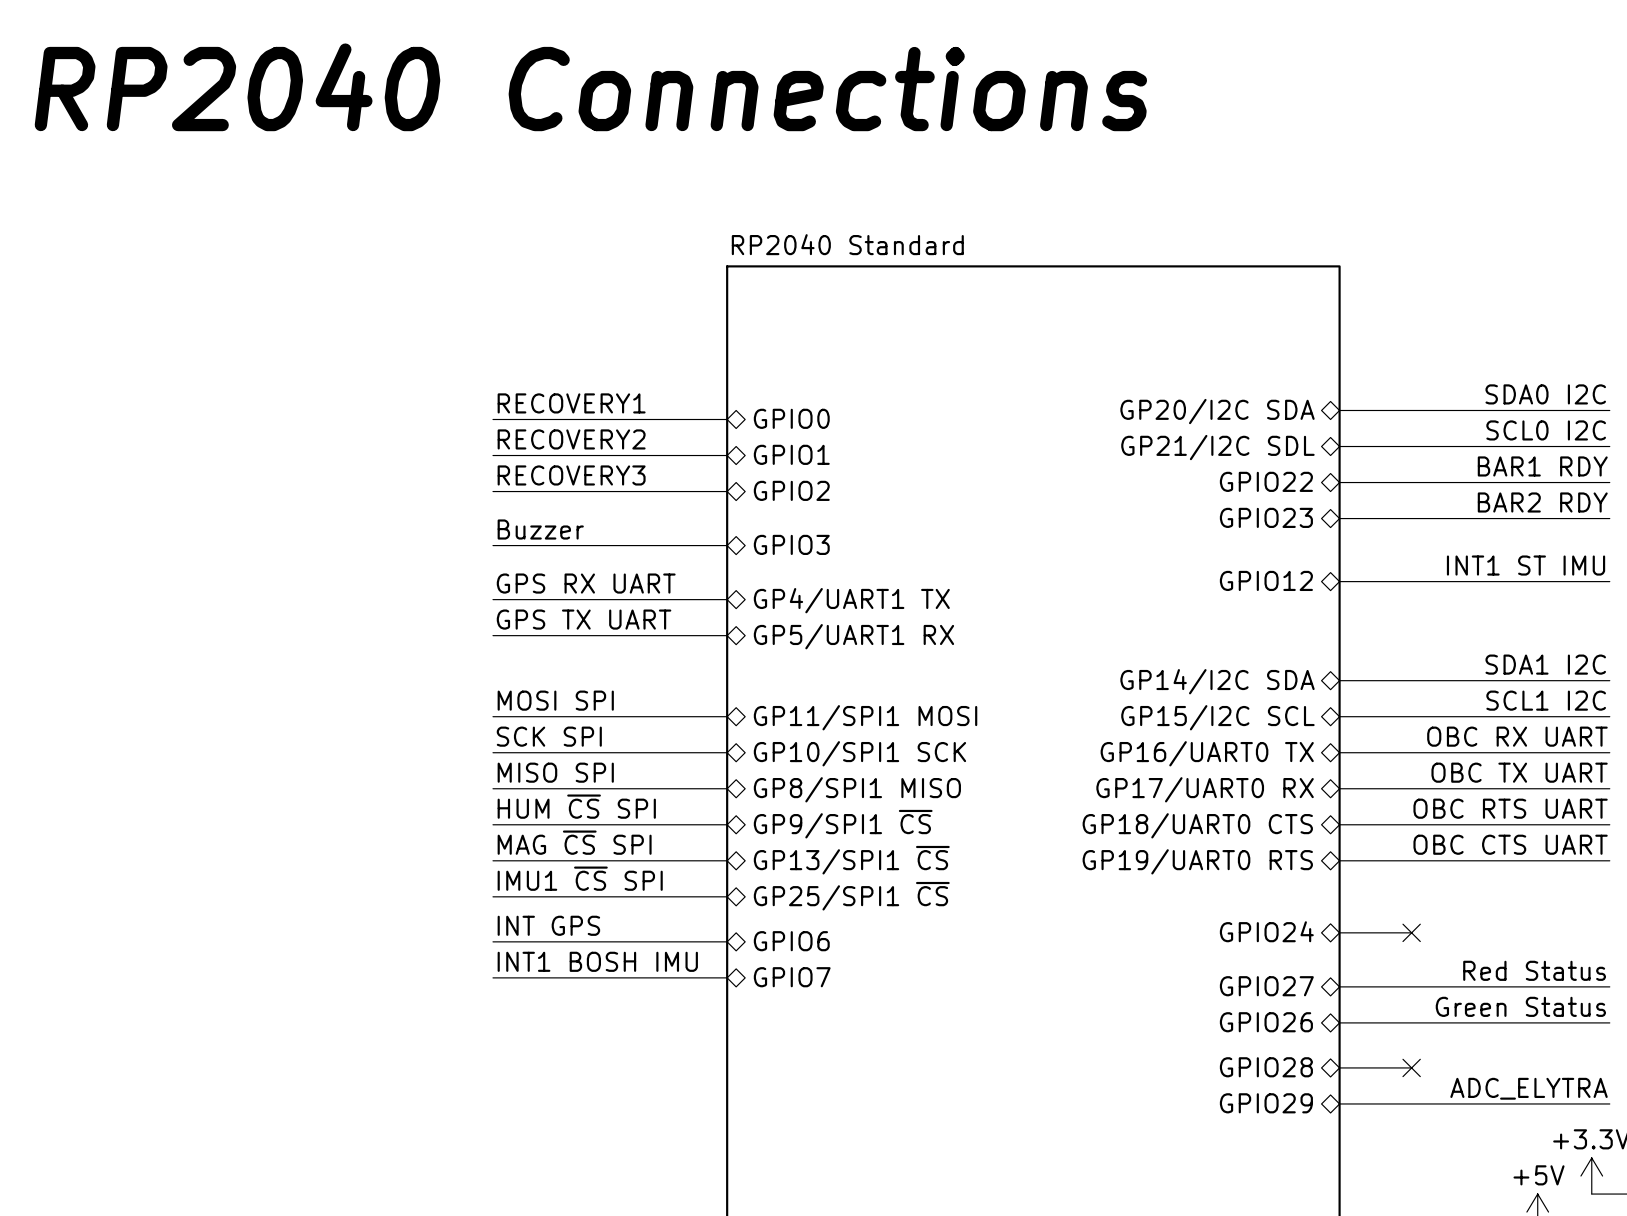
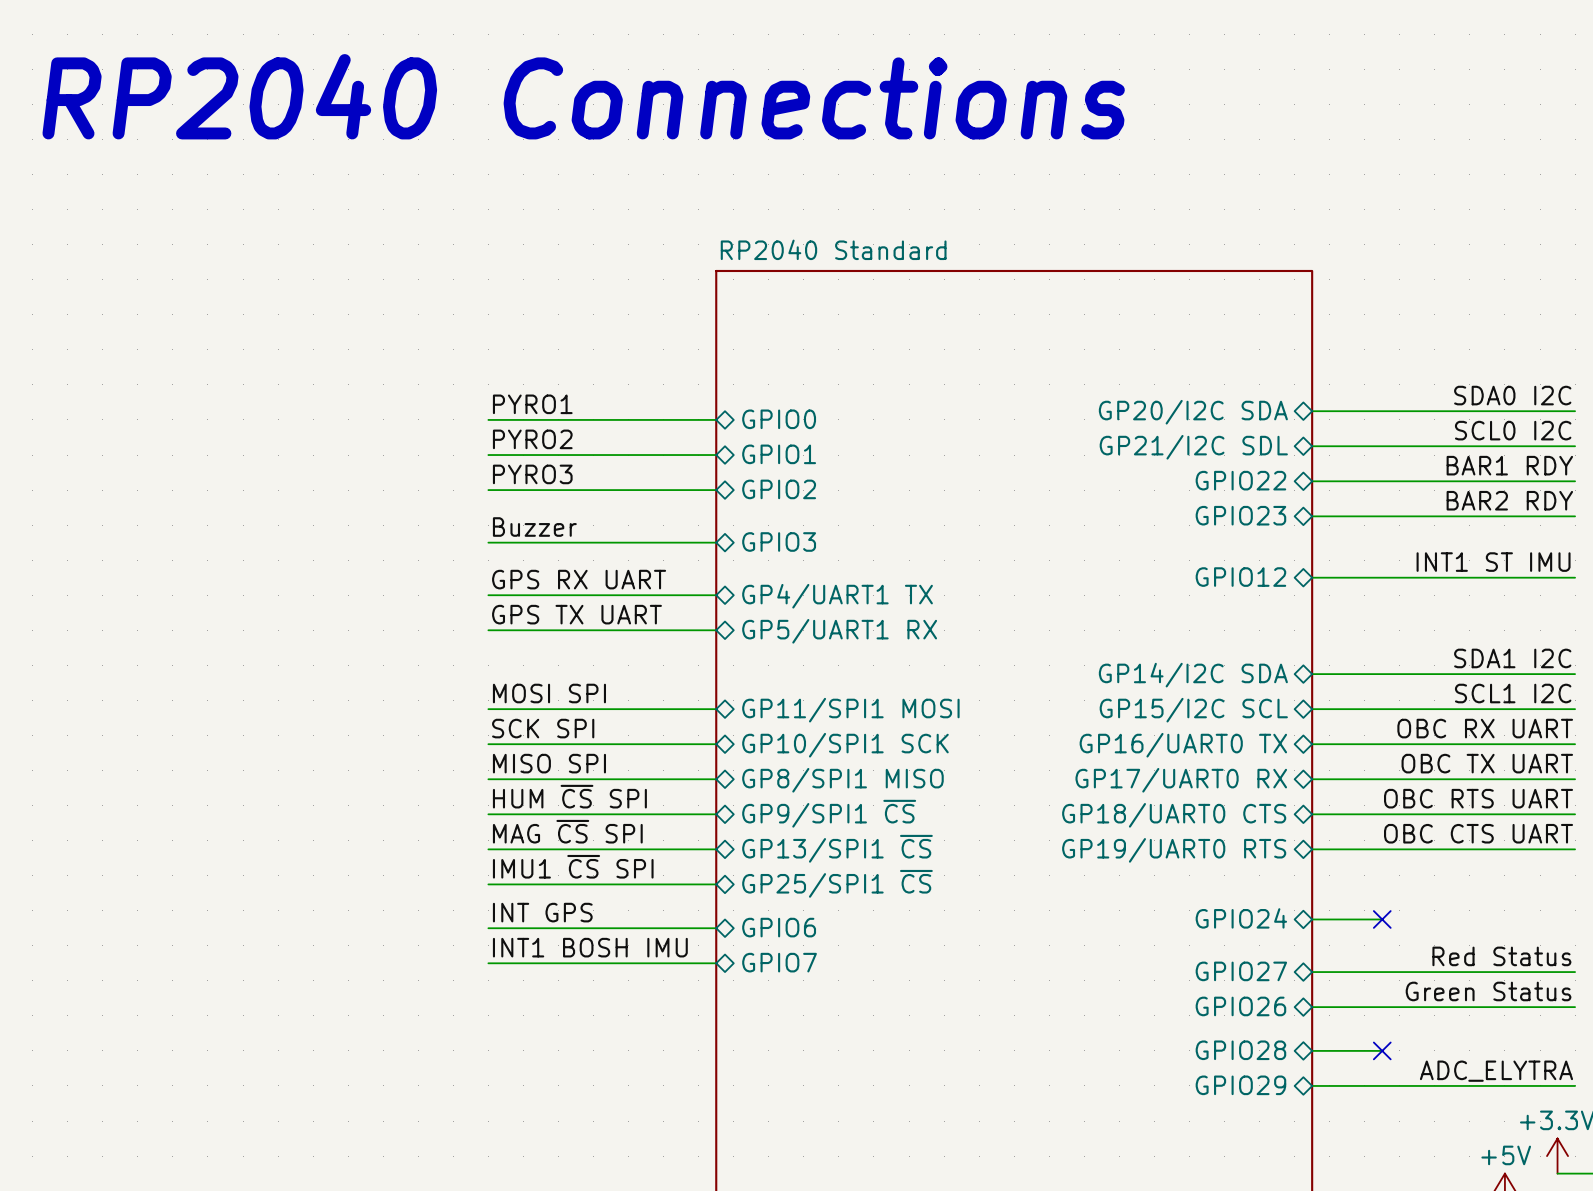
label: RECOVERY1 (571, 403) -> PYRO1 (532, 404)
label: RECOVERY2 (571, 439) -> PYRO2 (532, 439)
label: RECOVERY3 (571, 475) -> PYRO3 (532, 474)

